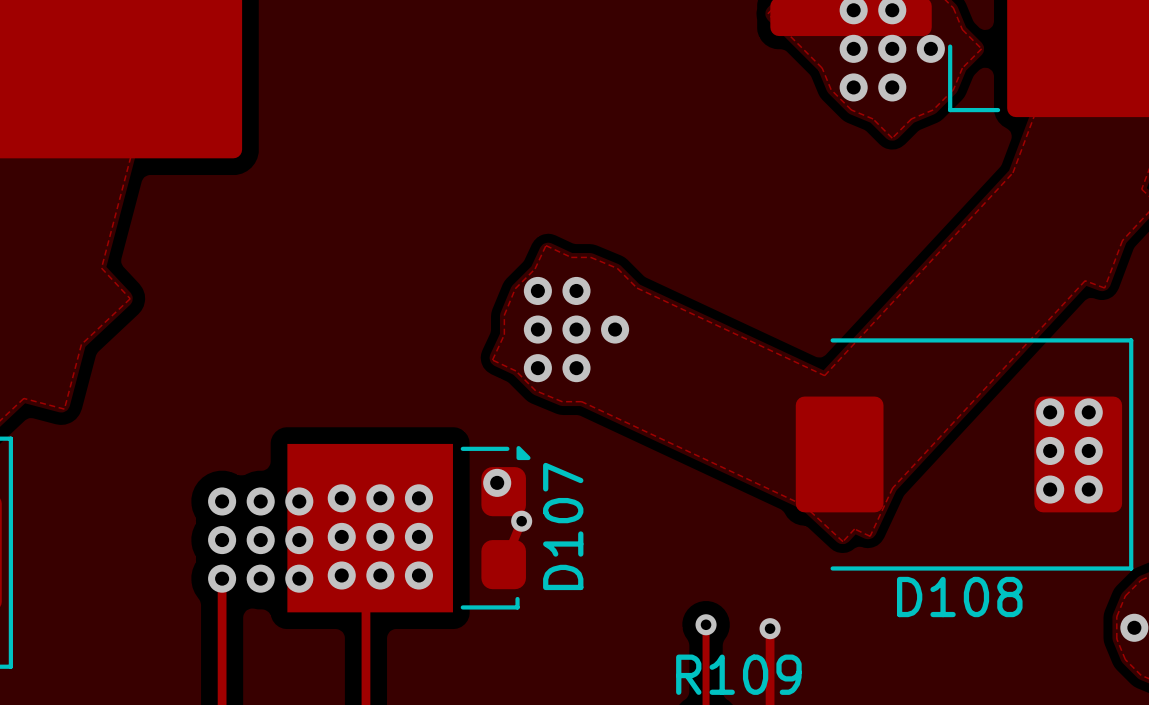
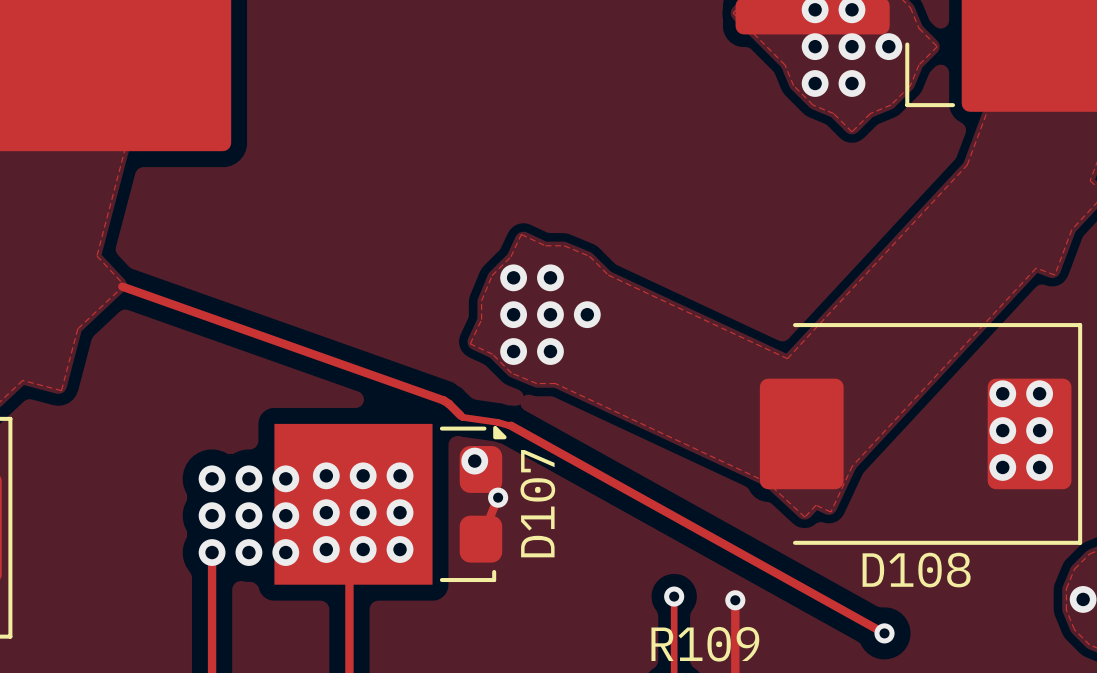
track: none -> (122, 286) (443, 400) (462, 417) (510, 425) (884, 633)
via: none -> (884, 633)

